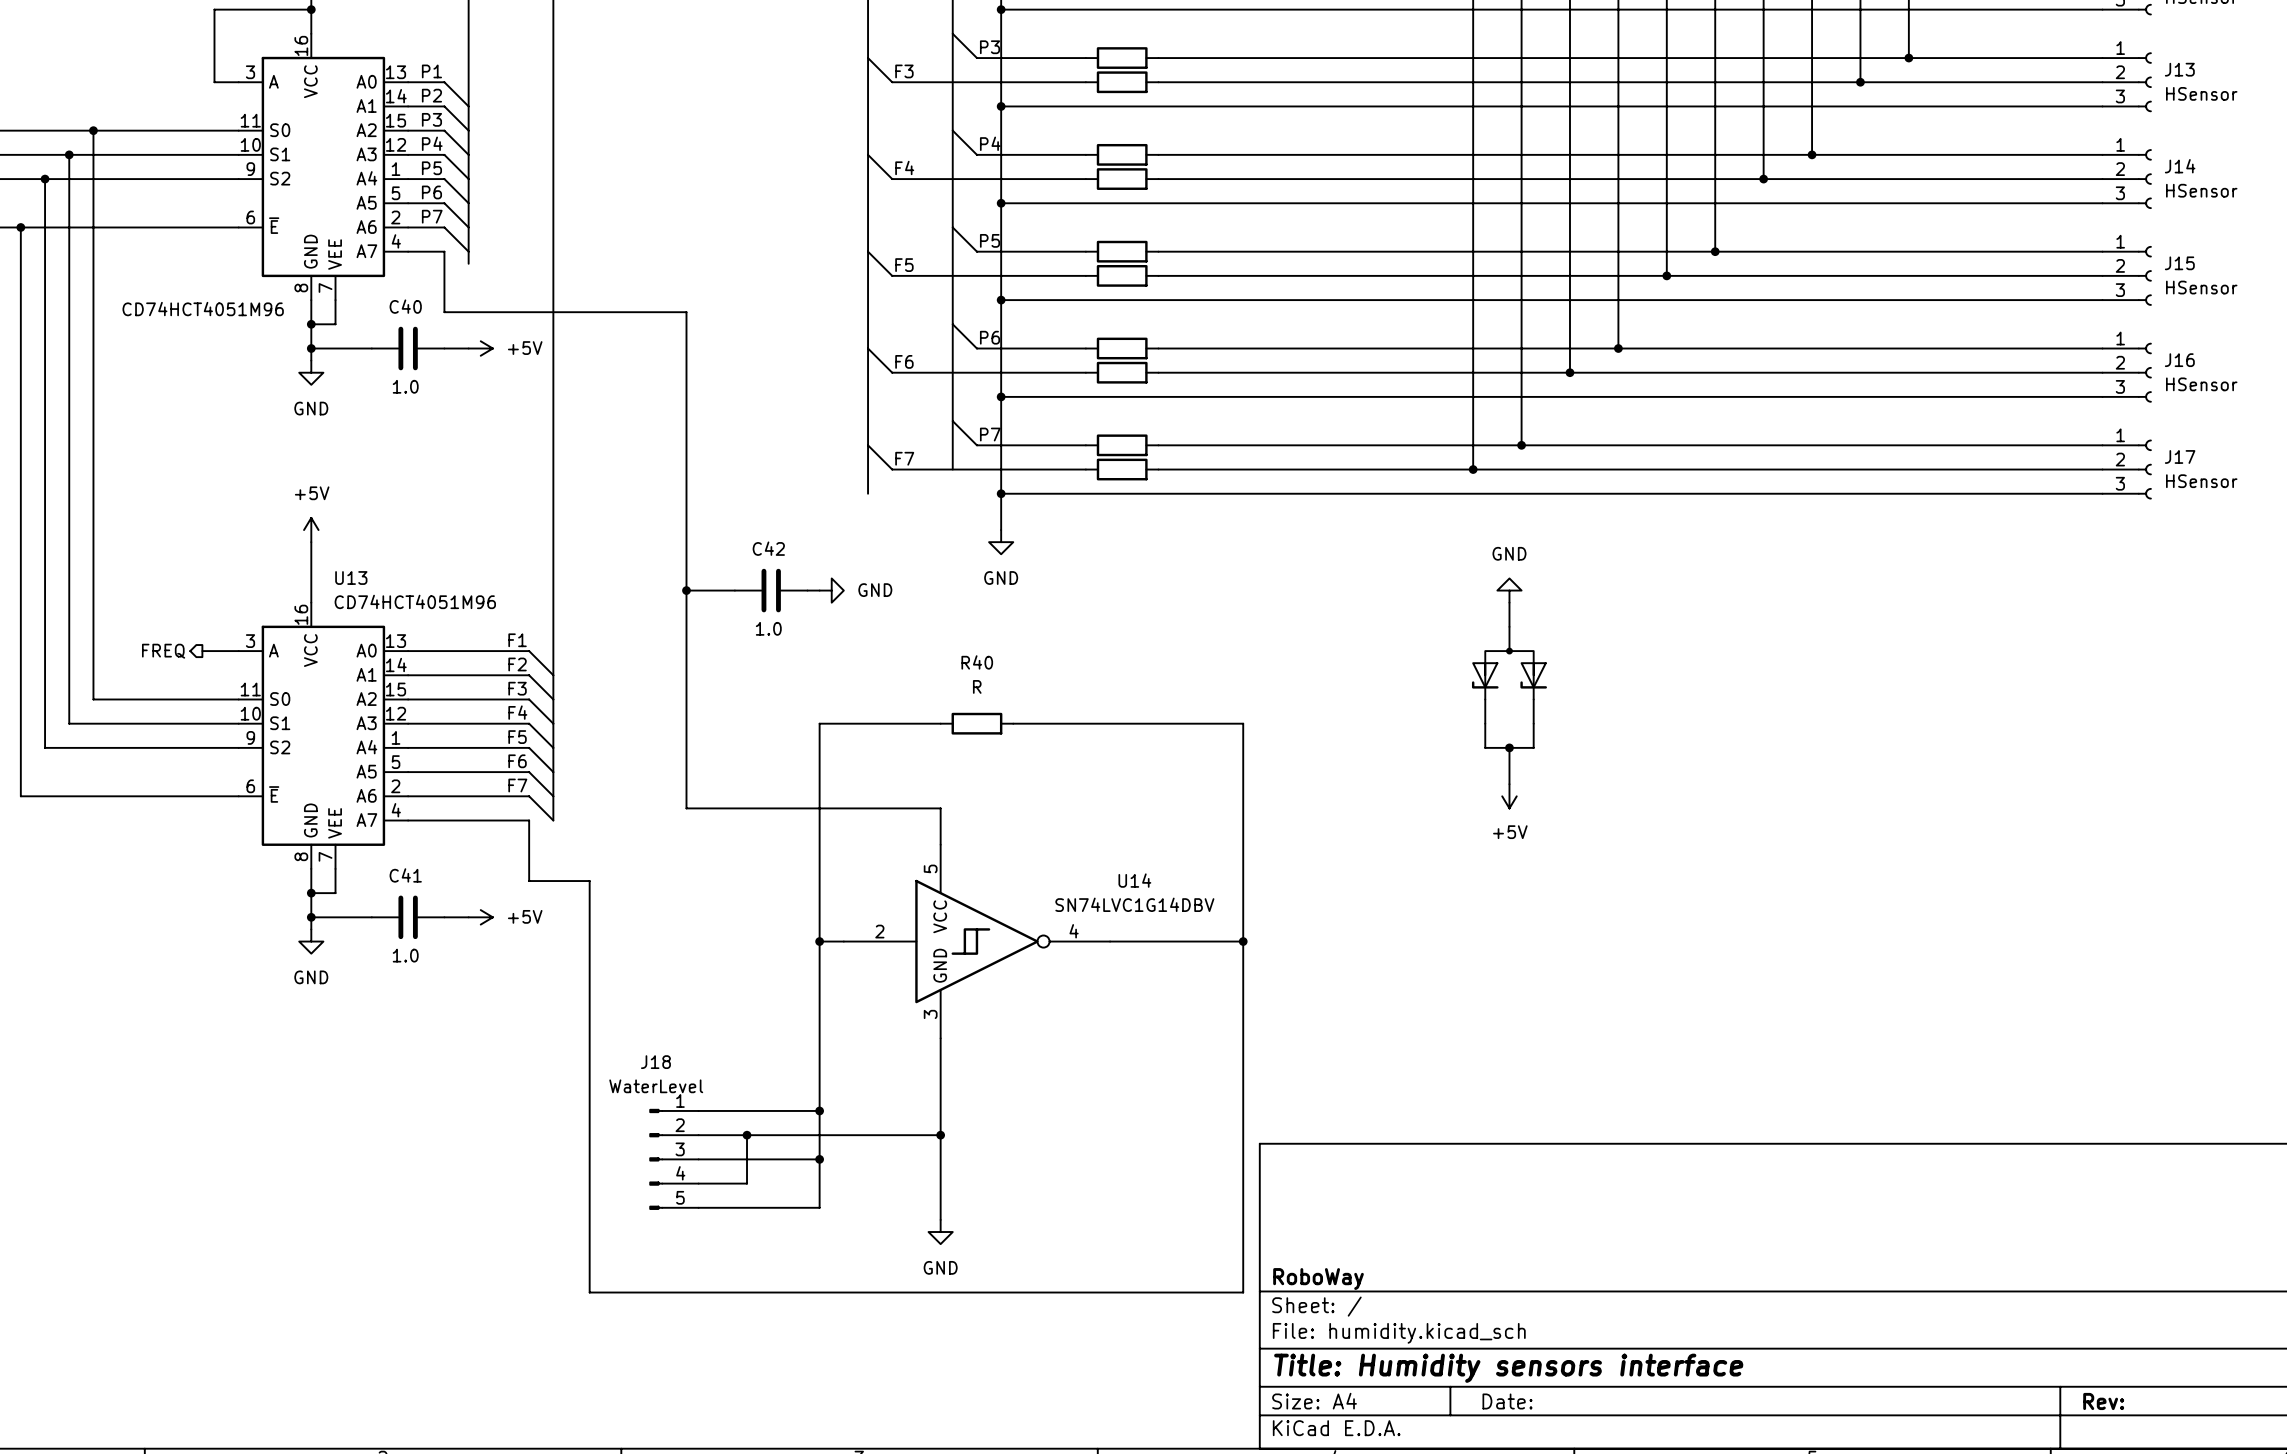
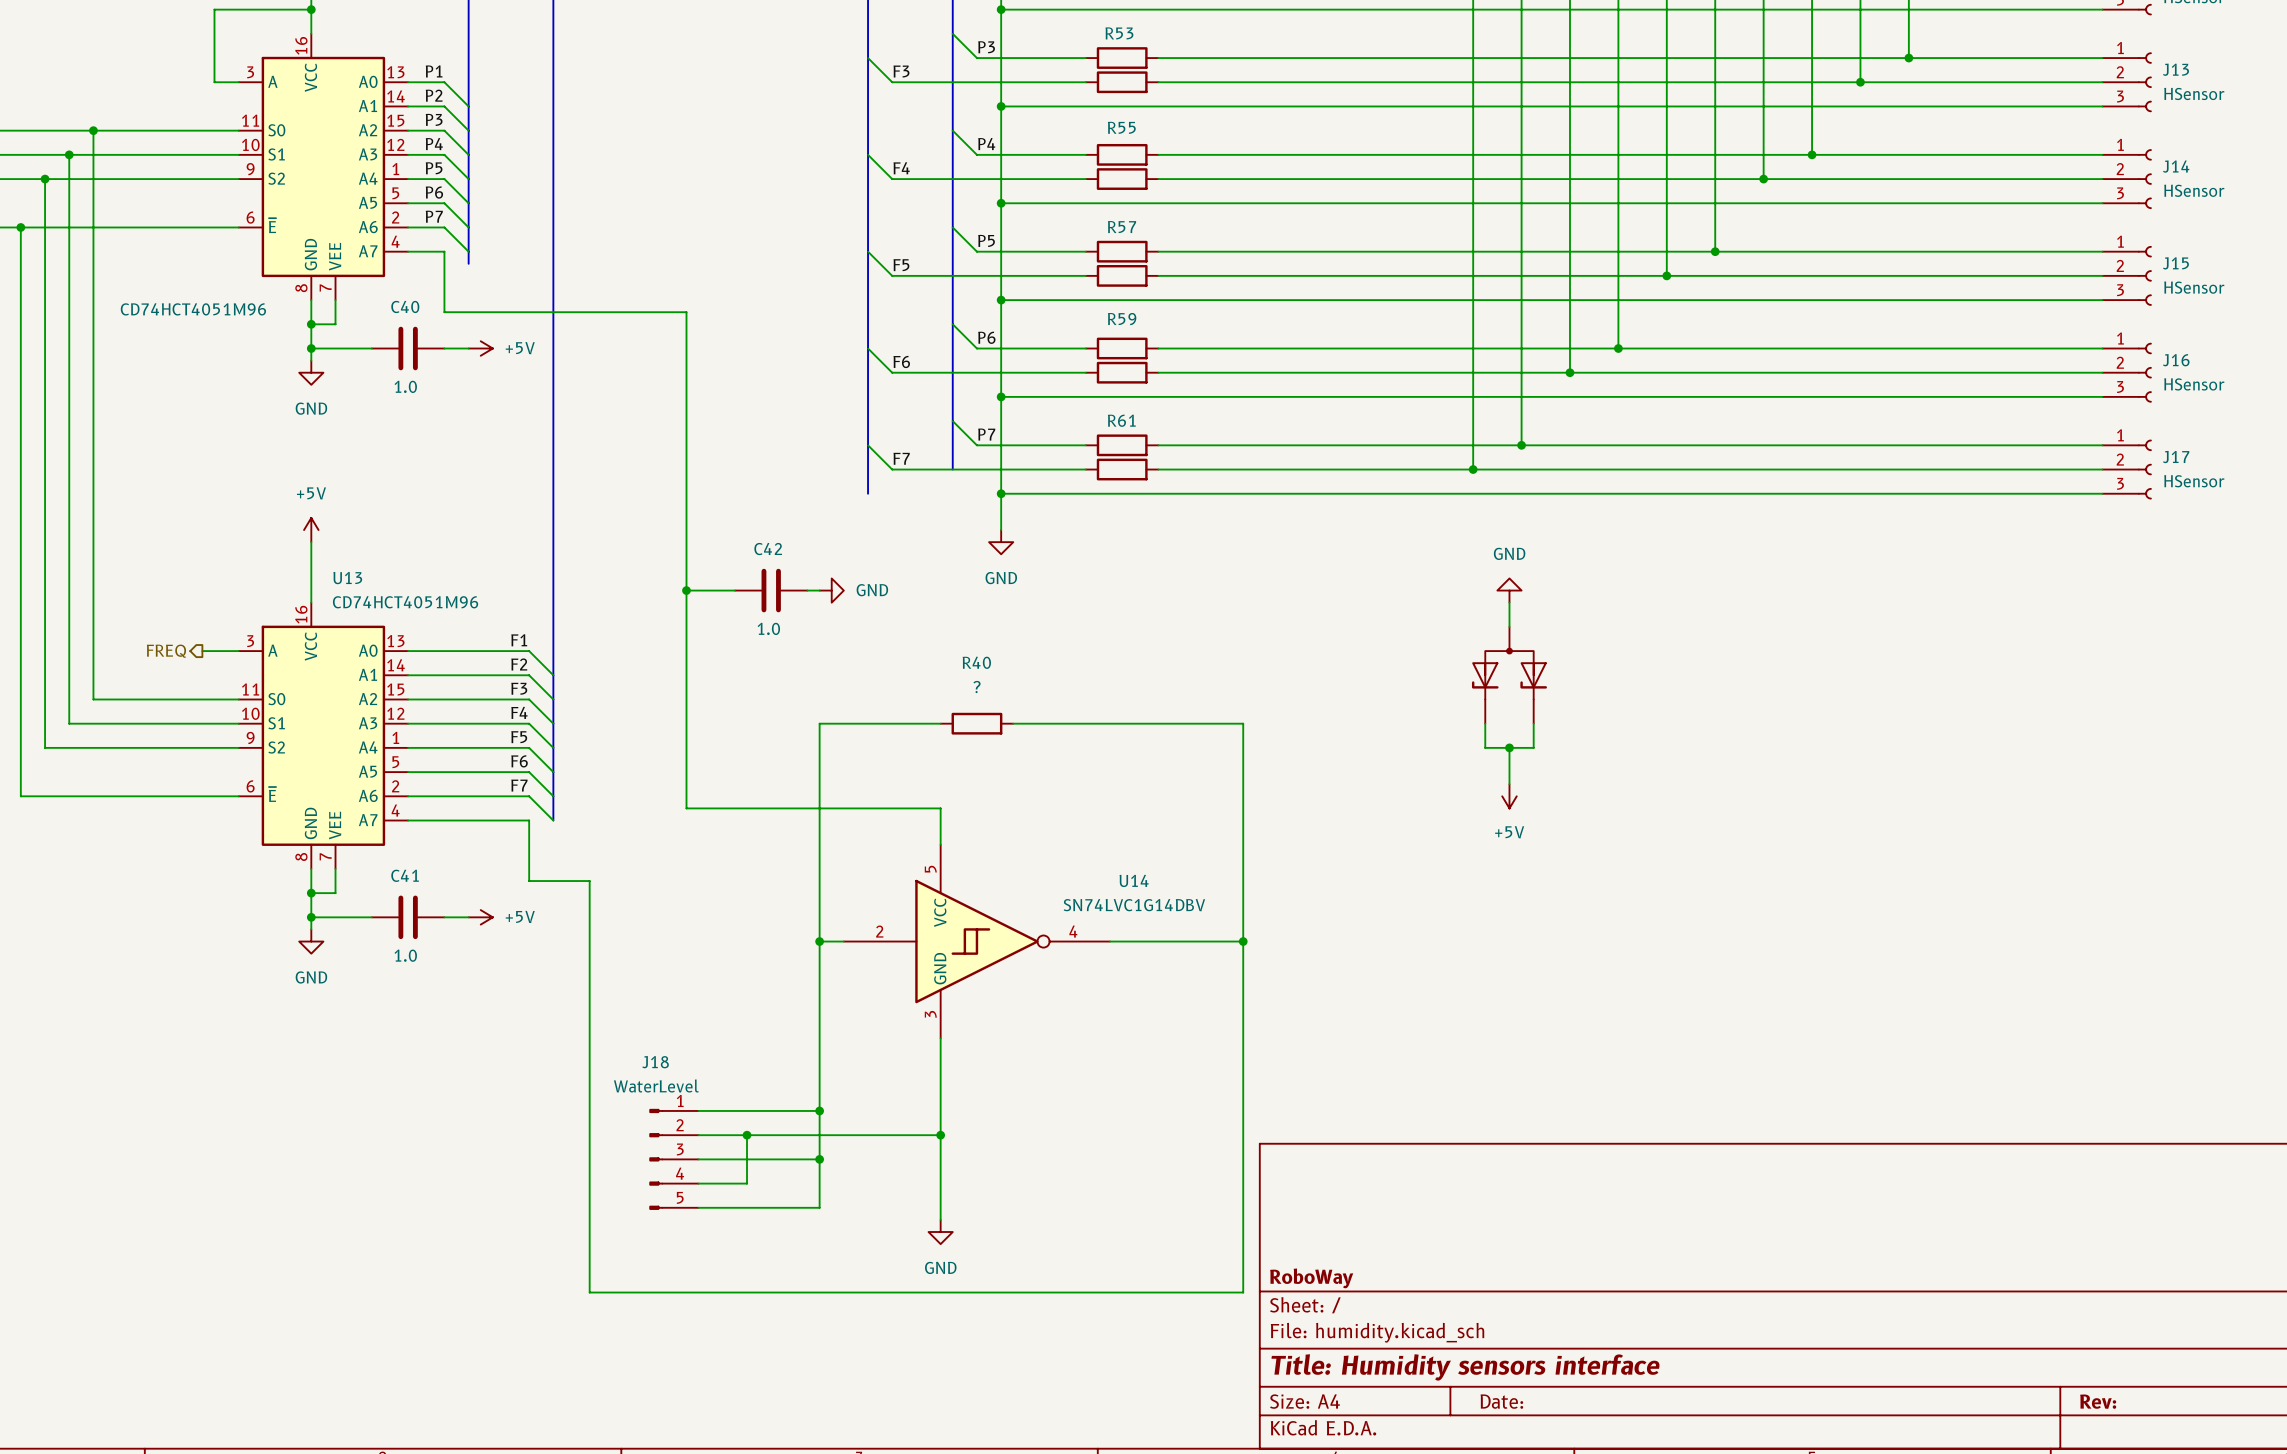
R53 name: none -> R53 (1119, 33)
R55 name: none -> R55 (1121, 127)
R57 name: none -> R57 (1122, 227)
R59 name: none -> R59 (1122, 319)
R61 name: none -> R61 (1121, 420)
R40 value: R (977, 686) -> ? (976, 687)

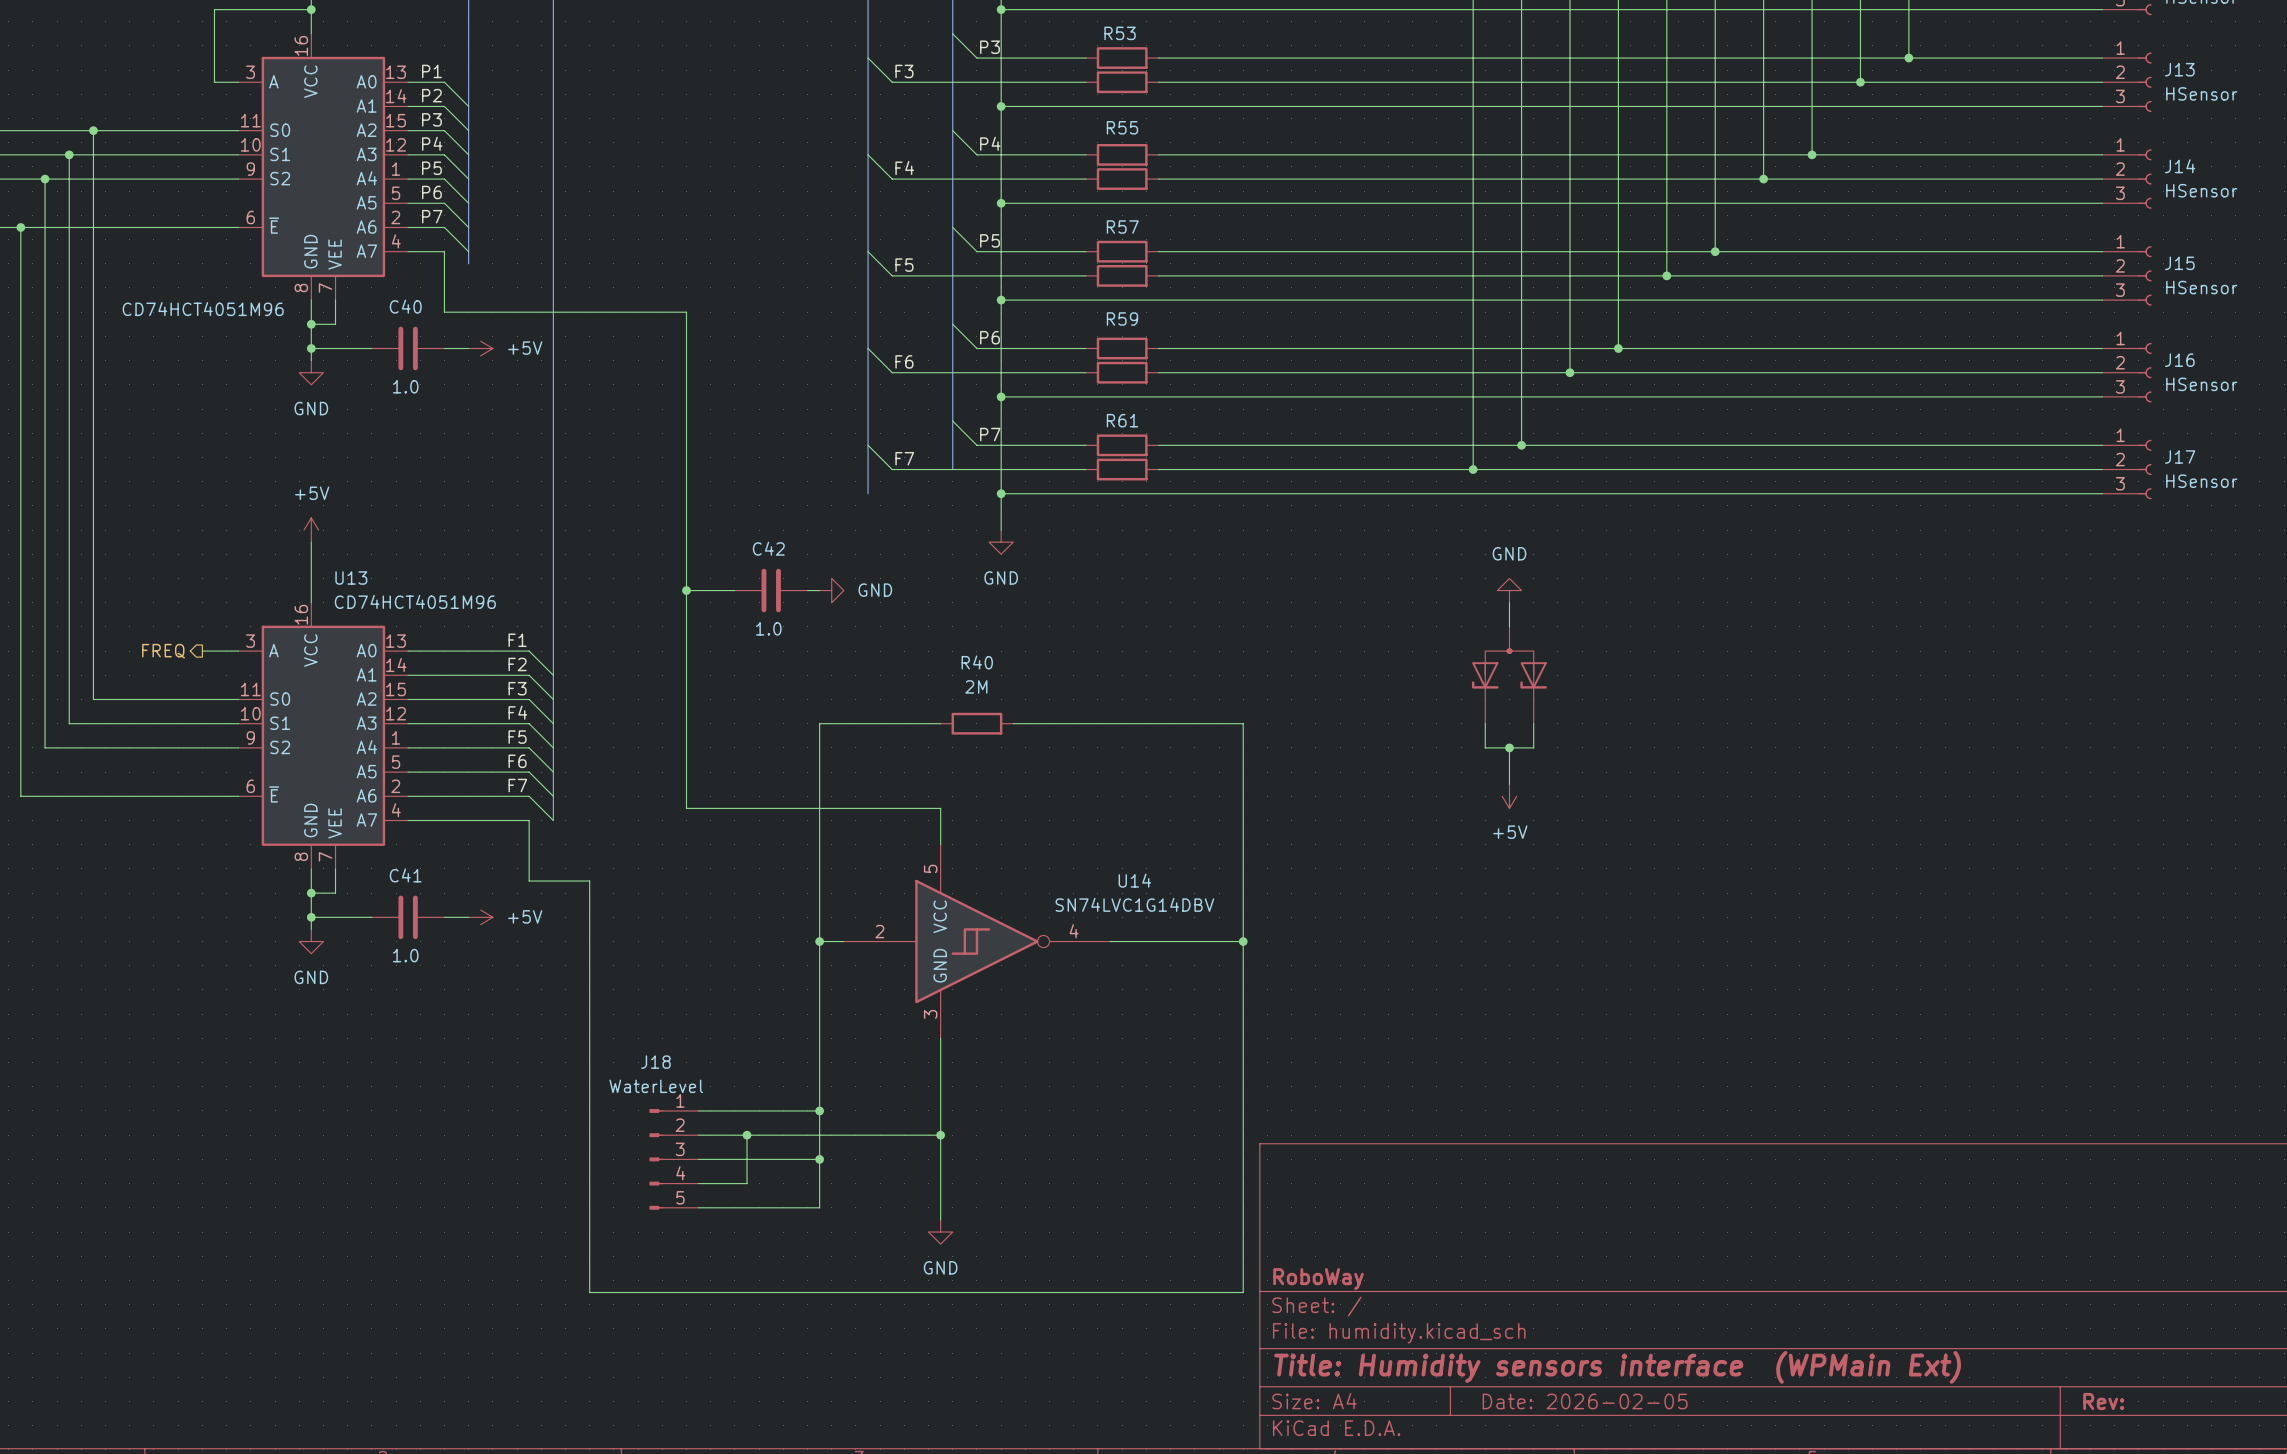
R40 value: ? (976, 687) -> 2M (976, 686)
title block: Title: Humidity sensors interface (1465, 1367) -> Title: Humidity sensors interface (WPMain Ext) (1617, 1367)
title block: Date: (1501, 1401) -> Date: 2026-02-05 (1585, 1401)

